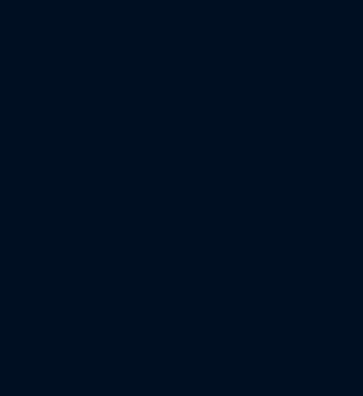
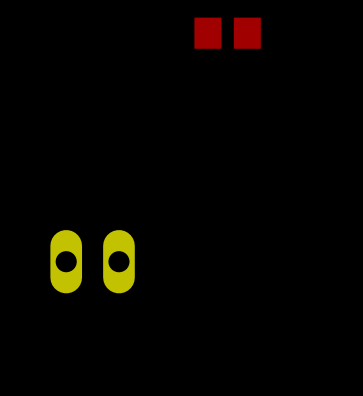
part: none -> (227, 33)
part: none -> (92, 261)

